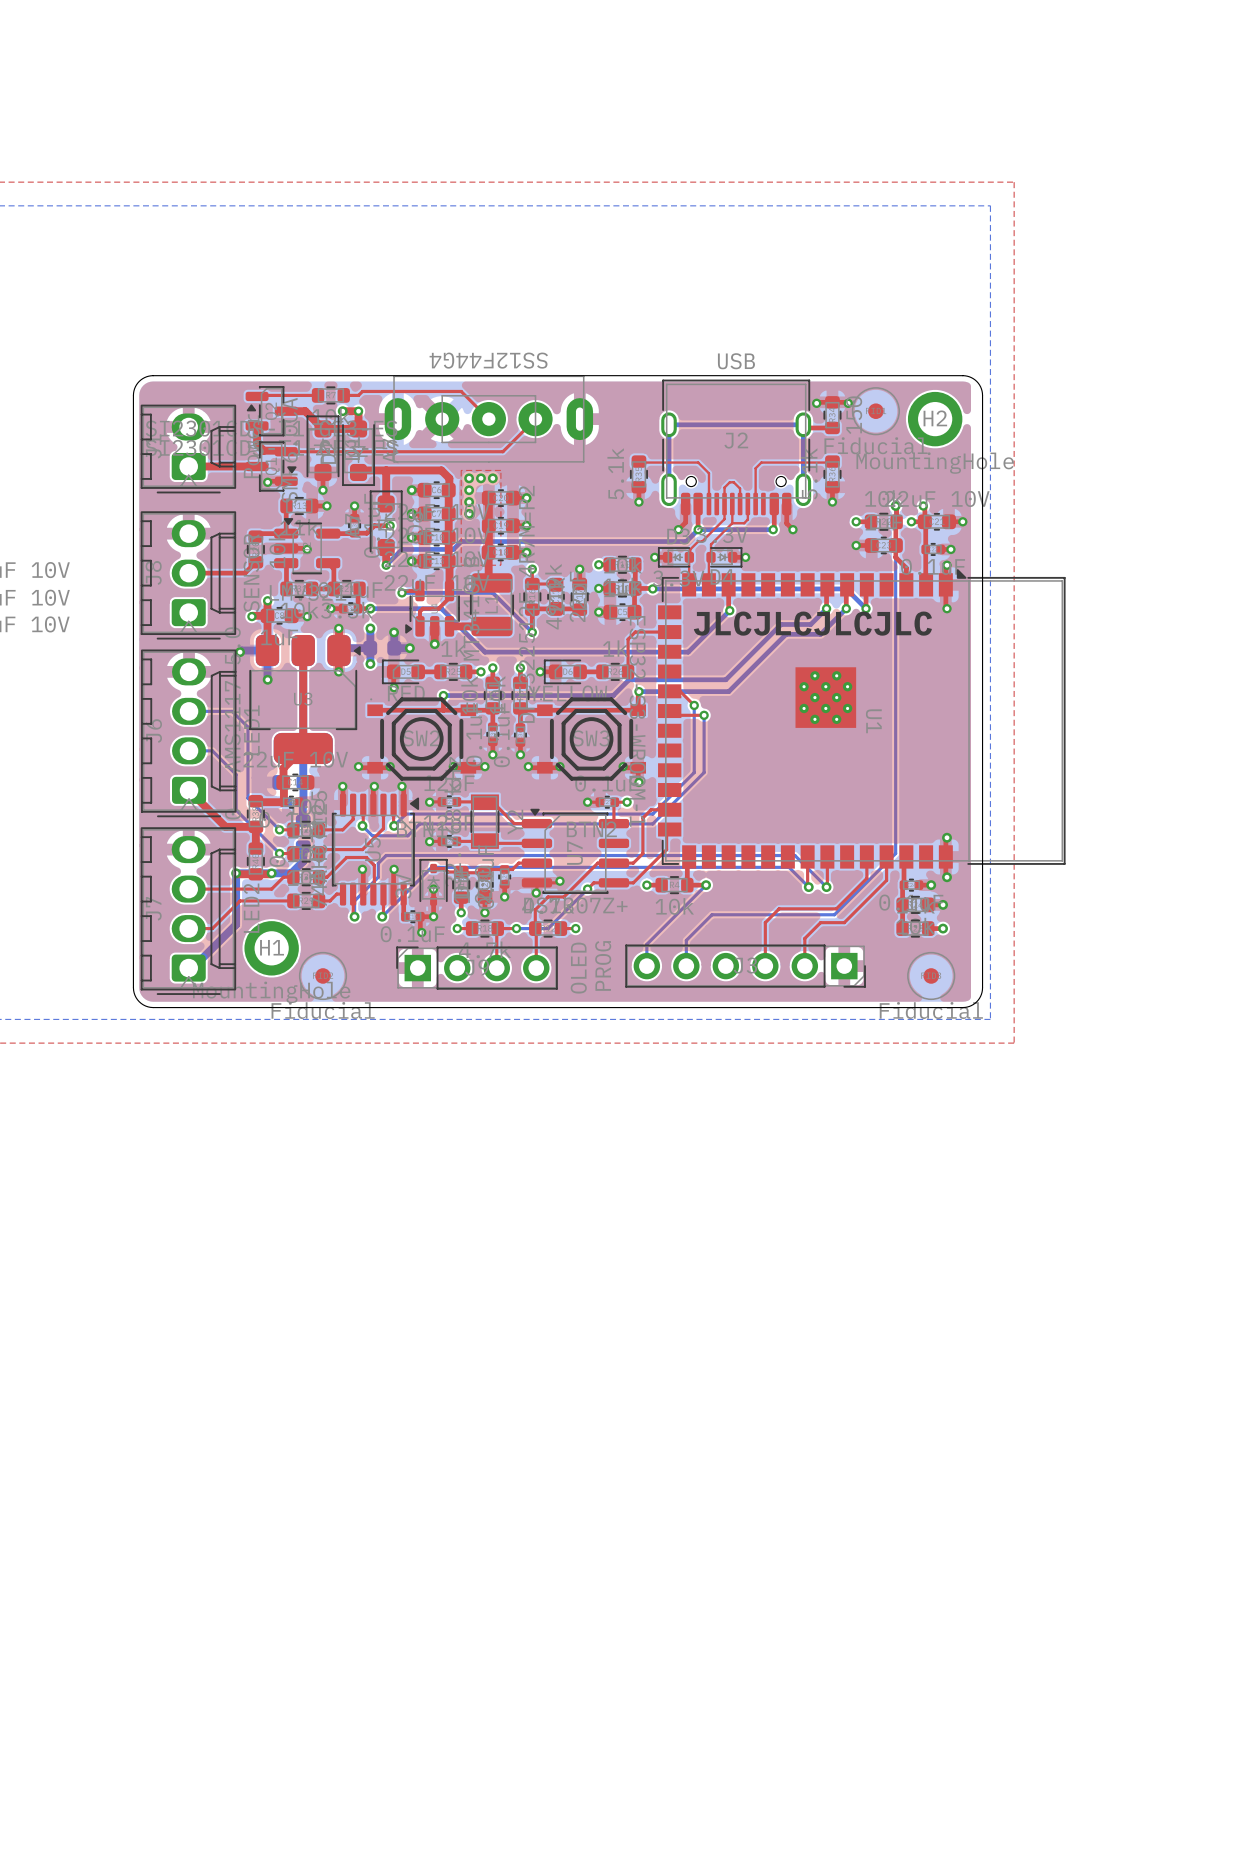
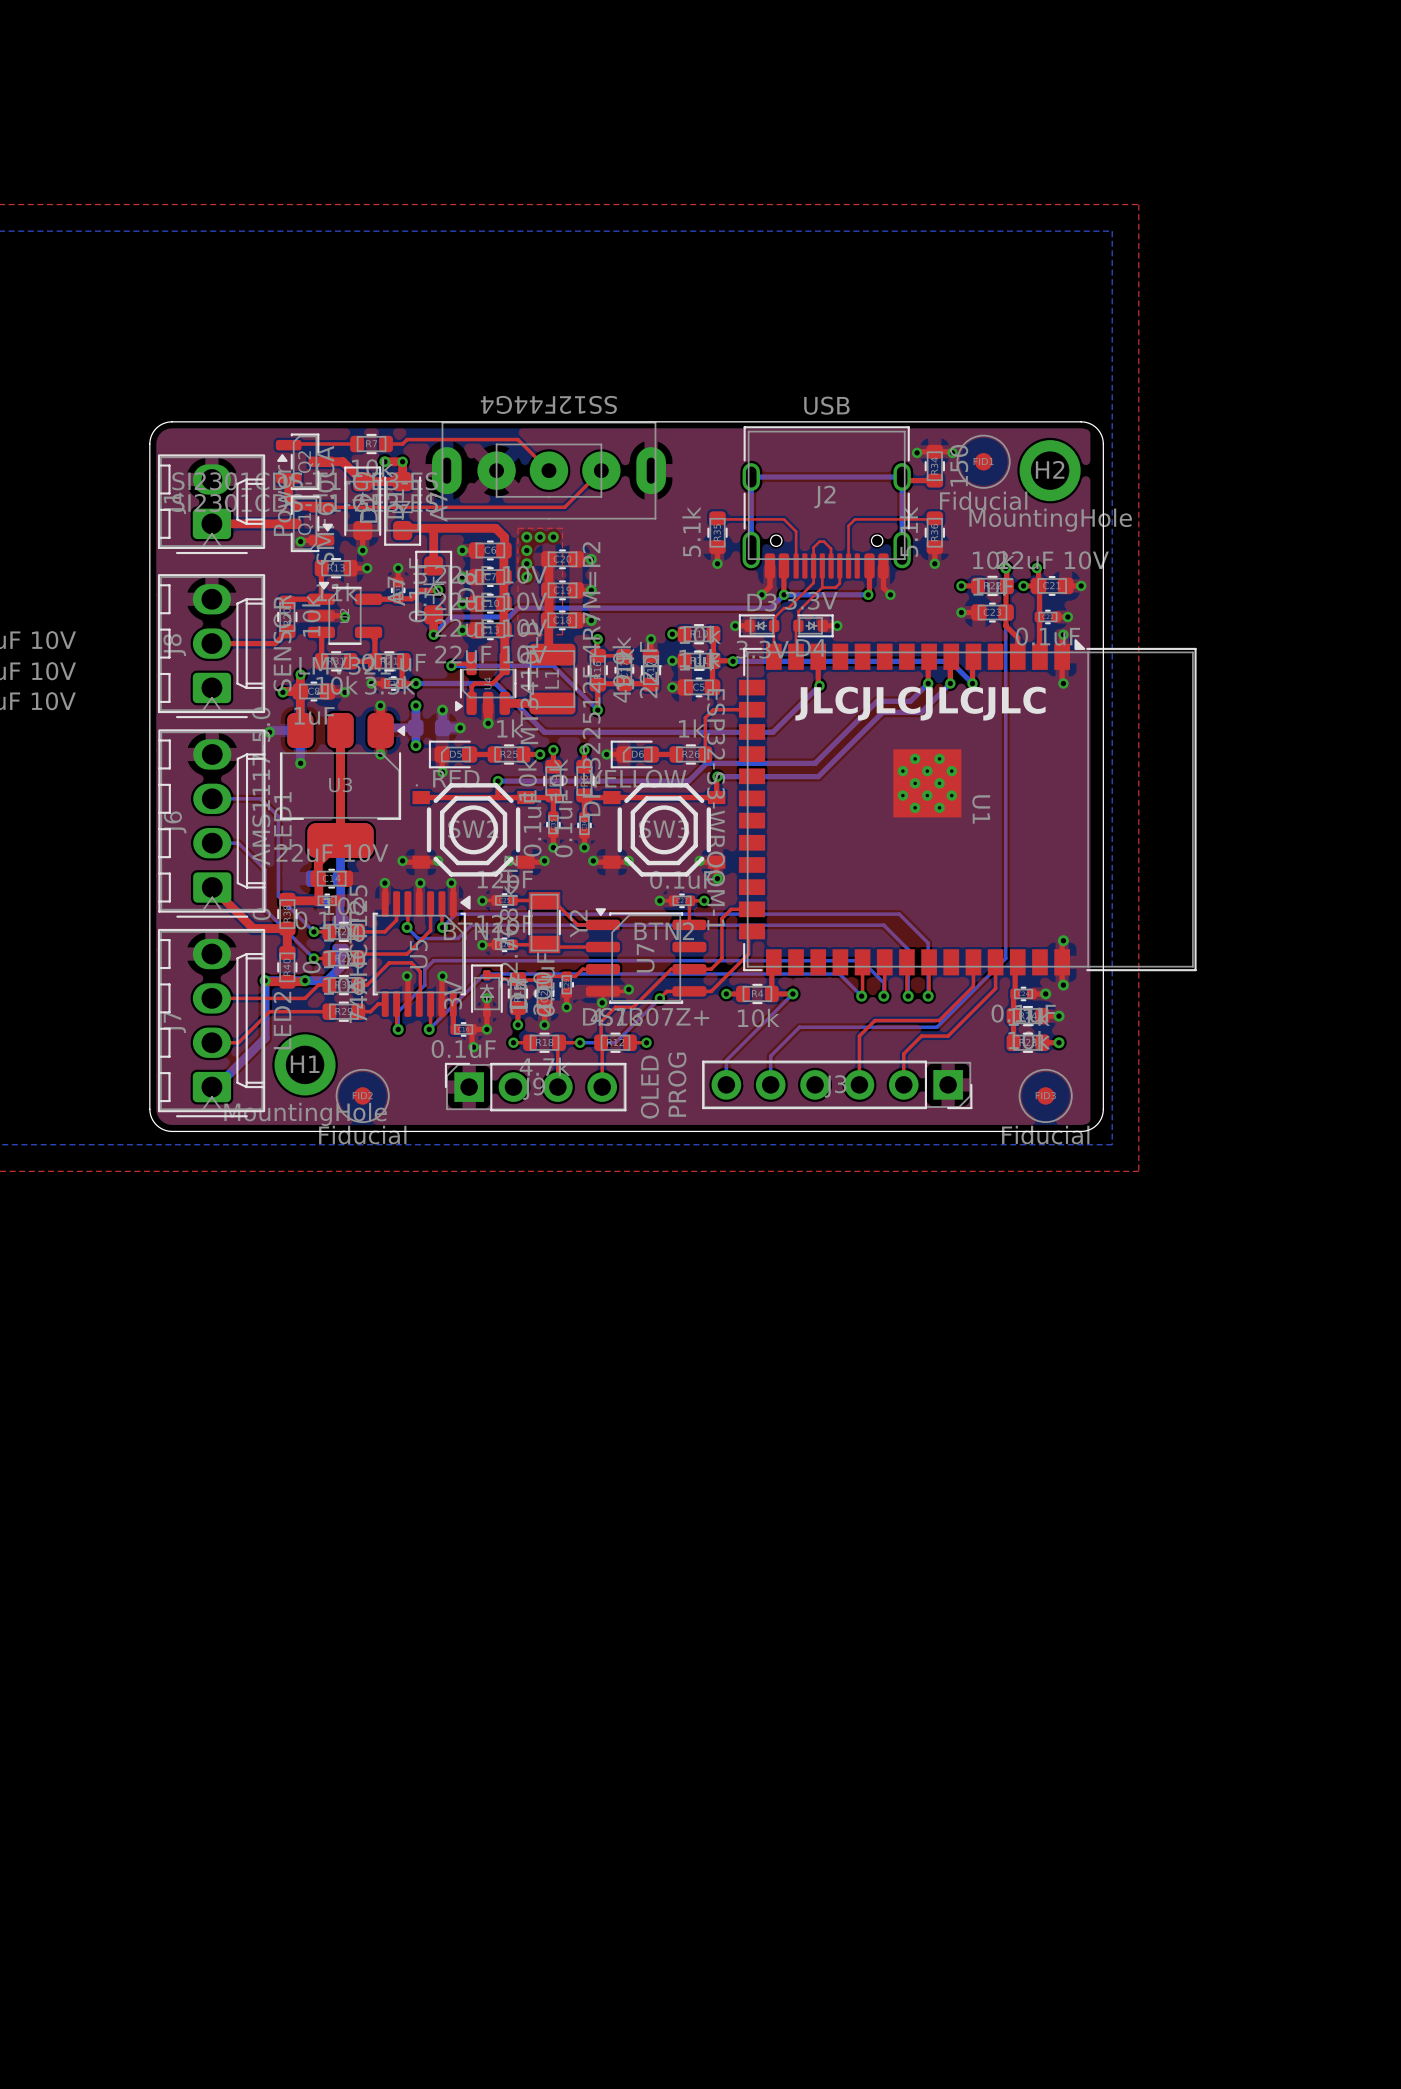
top track: (669, 691) (680, 691) (694, 705) -> none
bottom track: (694, 705) (694, 772) (652, 814) -> (928, 996) (928, 942) (899, 914) (733, 914)
via: (694, 705) -> none
top track: (669, 711) (673, 715) (704, 715) -> none
bottom track: (704, 715) (704, 772) (652, 823) -> (908, 996) (908, 949) (883, 925) (733, 925)
via: (704, 715) -> none
bottom track: (767, 855) (794, 855) (826, 887) -> (861, 960) (883, 982) (883, 996)
top track: none -> (862, 962) (861, 996)
top track: none -> (884, 962) (883, 996)
bottom track: (747, 867) (789, 867) (808, 887) -> (839, 974) (861, 996)
via: none -> (861, 996)
via: none -> (883, 996)

